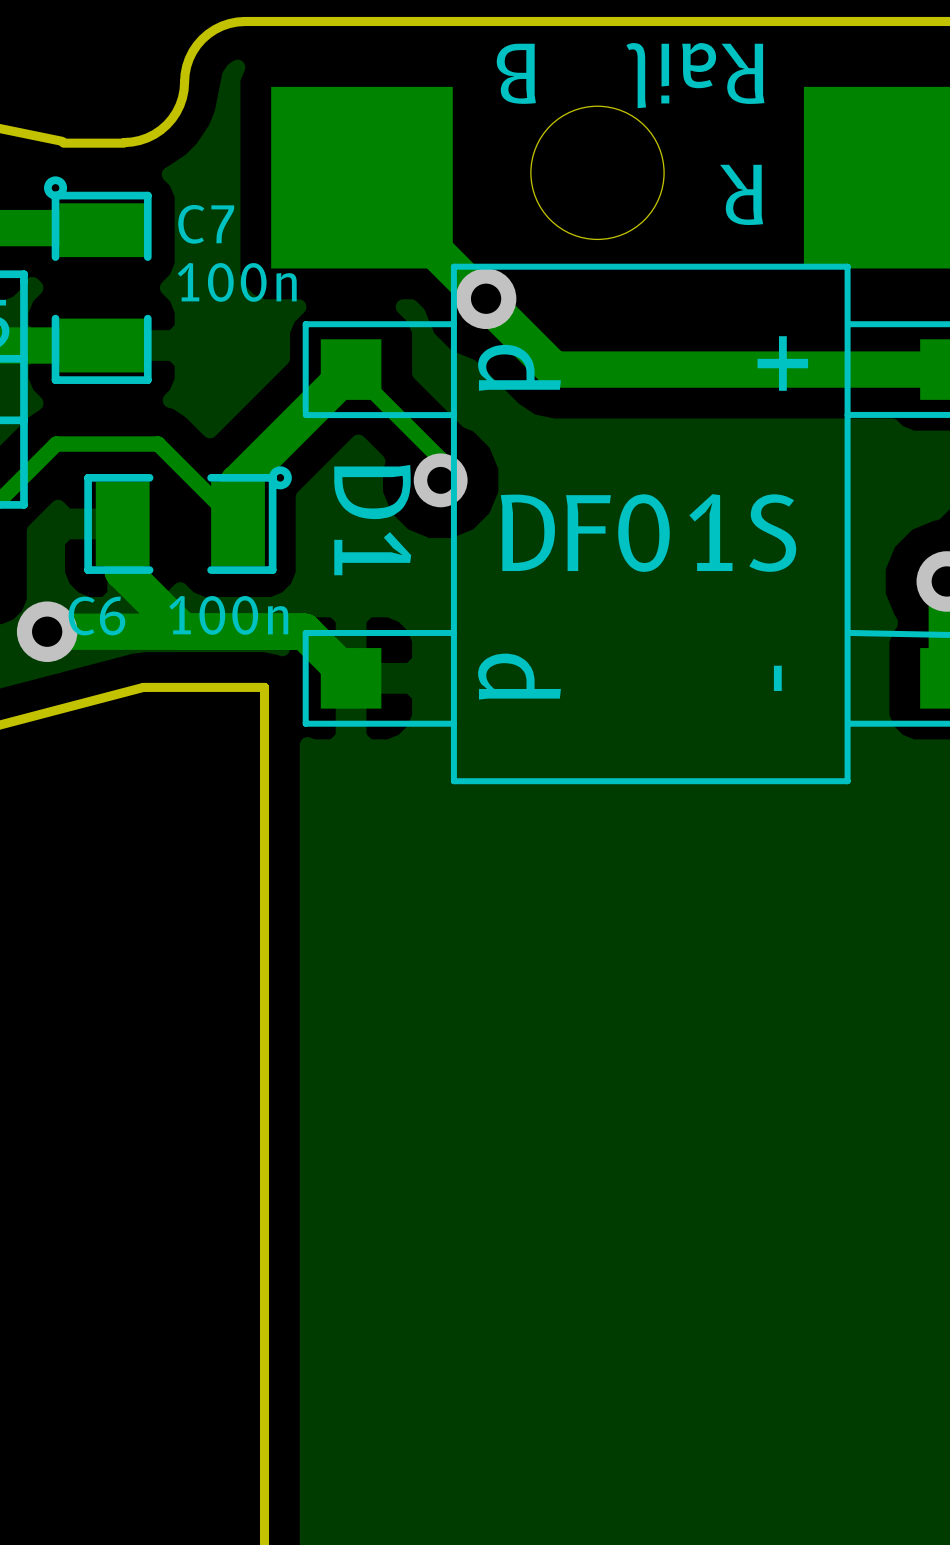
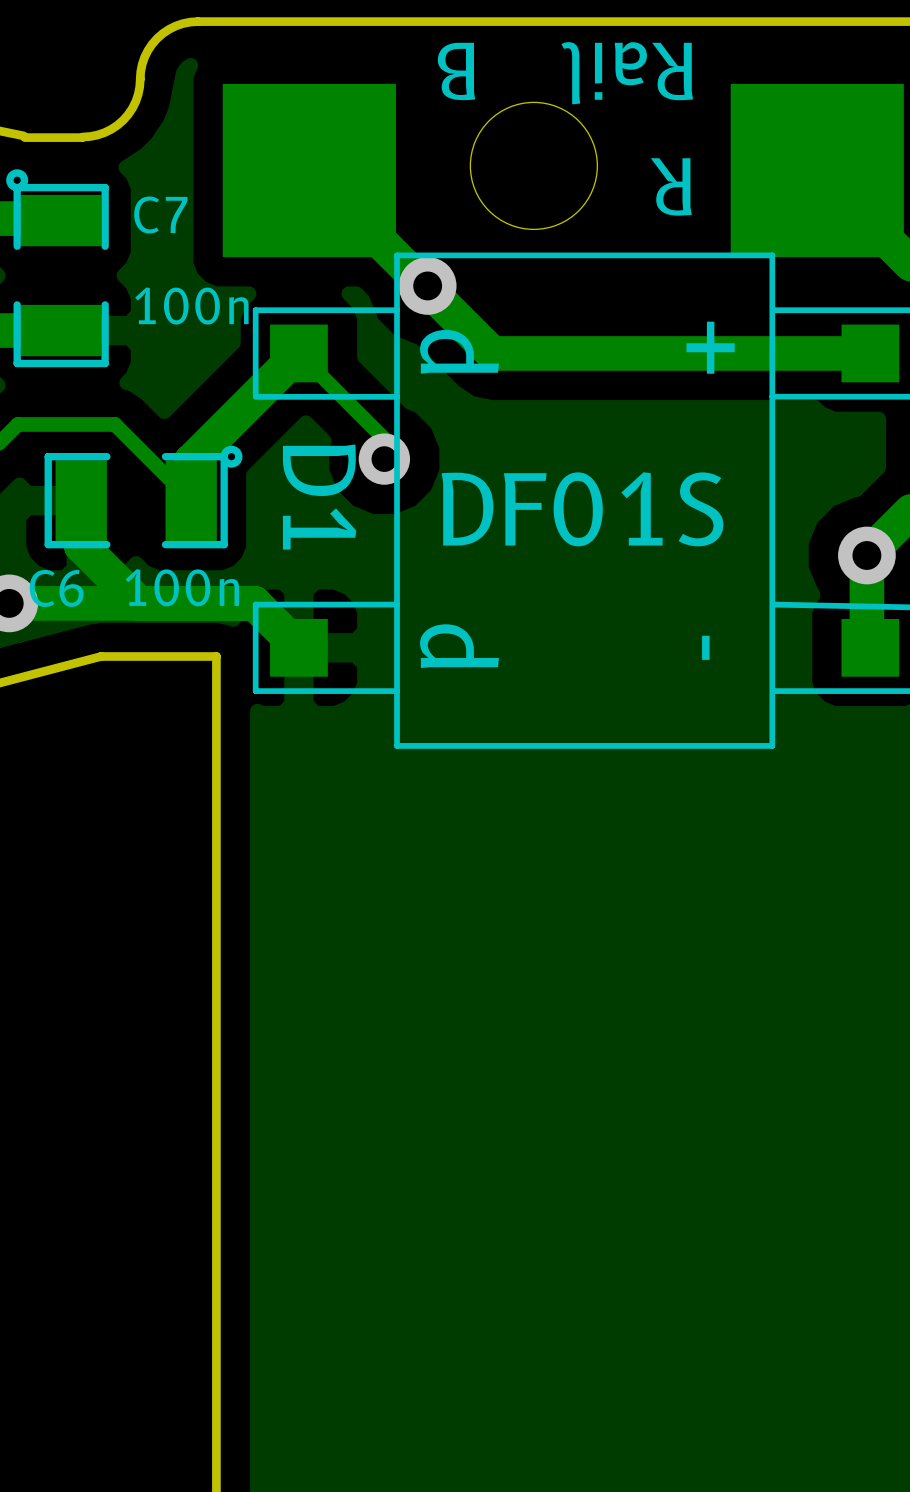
C7 value position: 100n (237, 282) -> 100n (191, 306)

